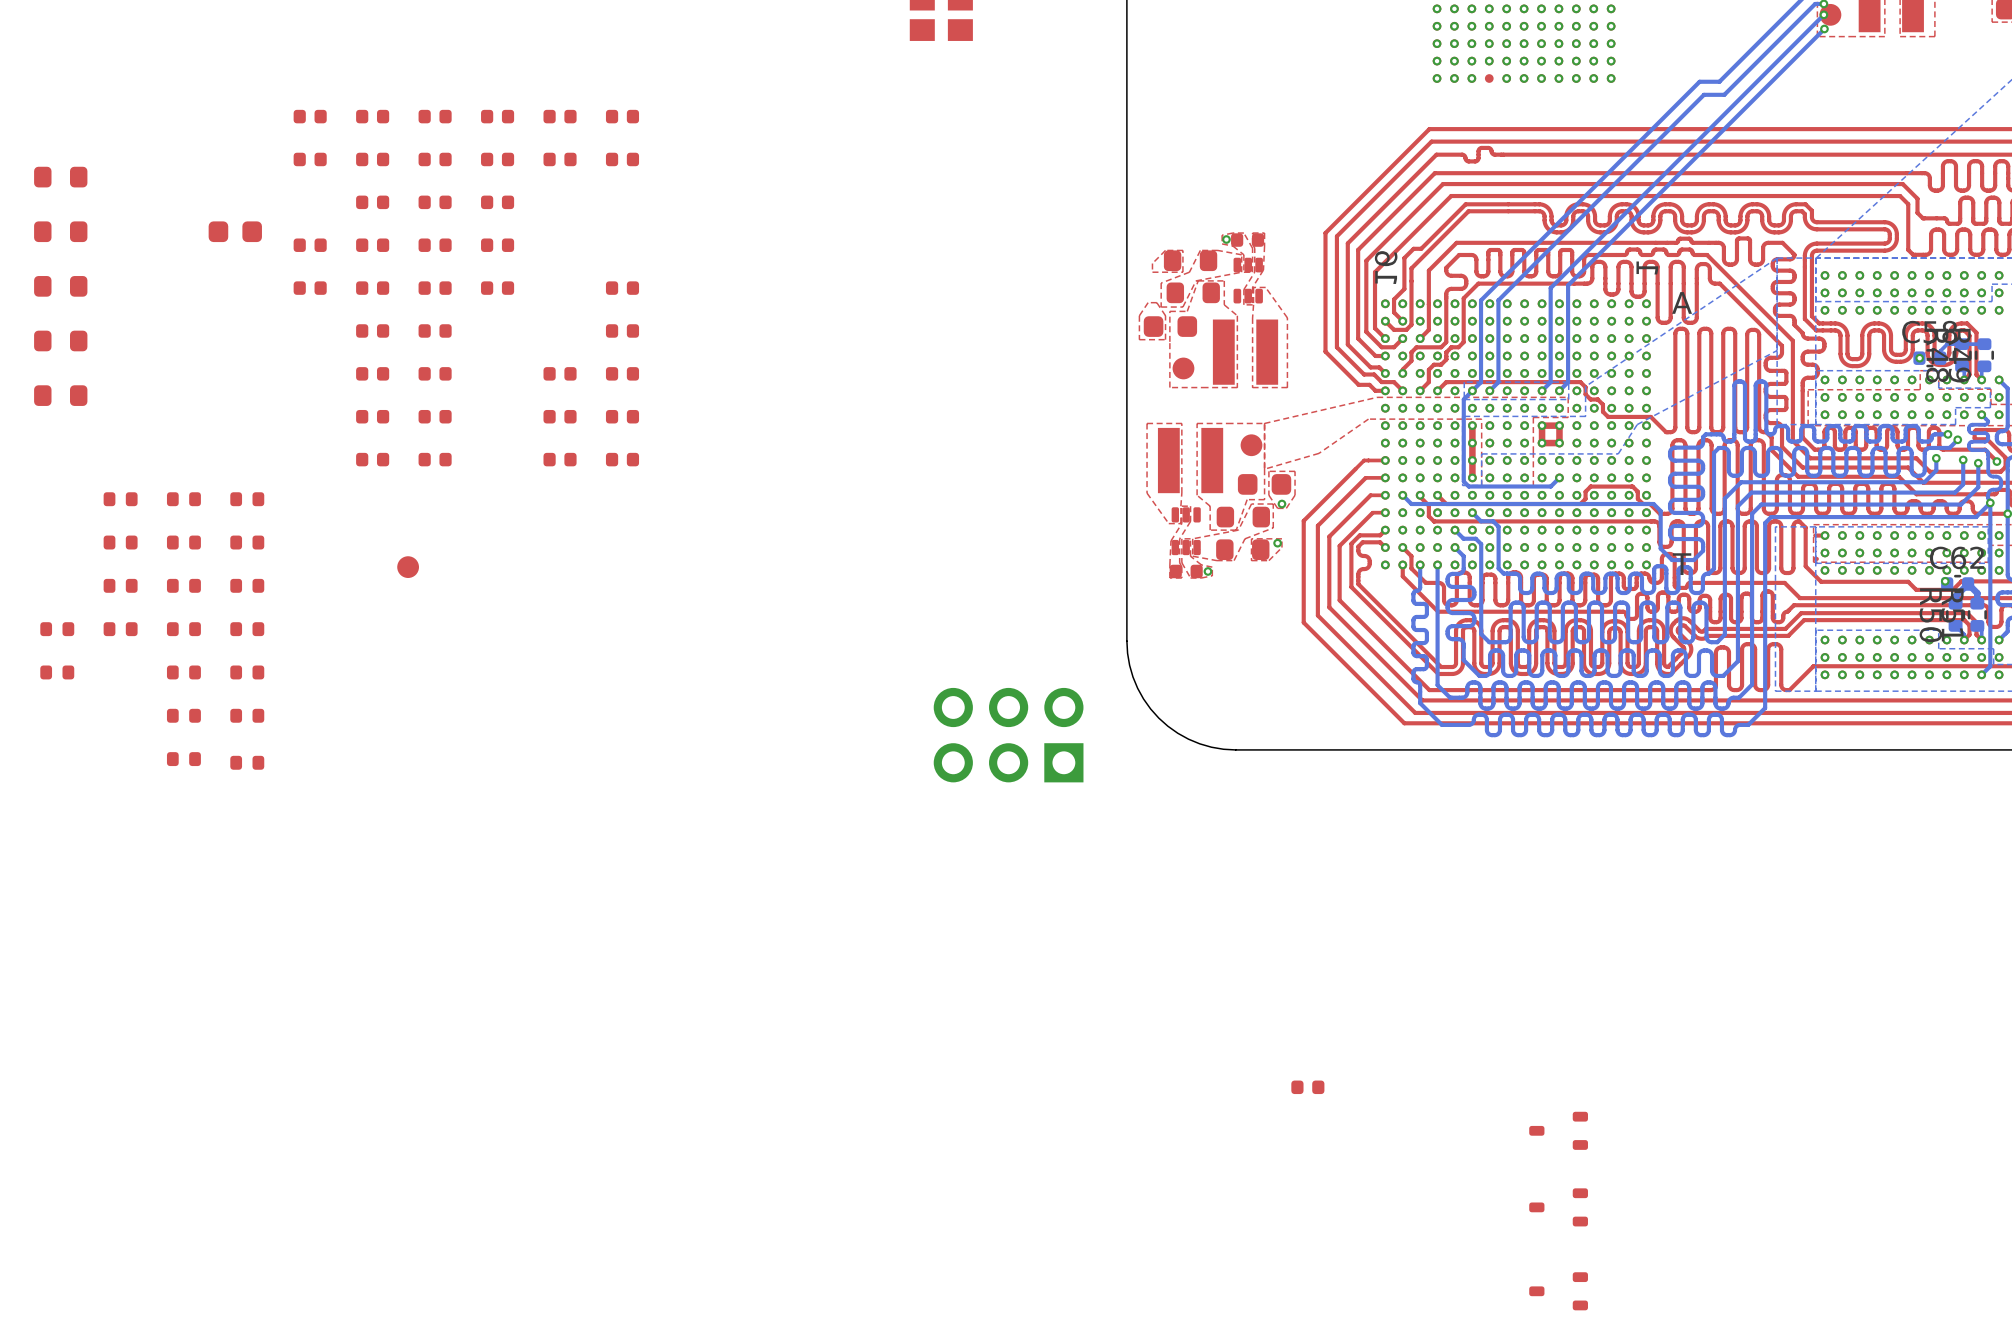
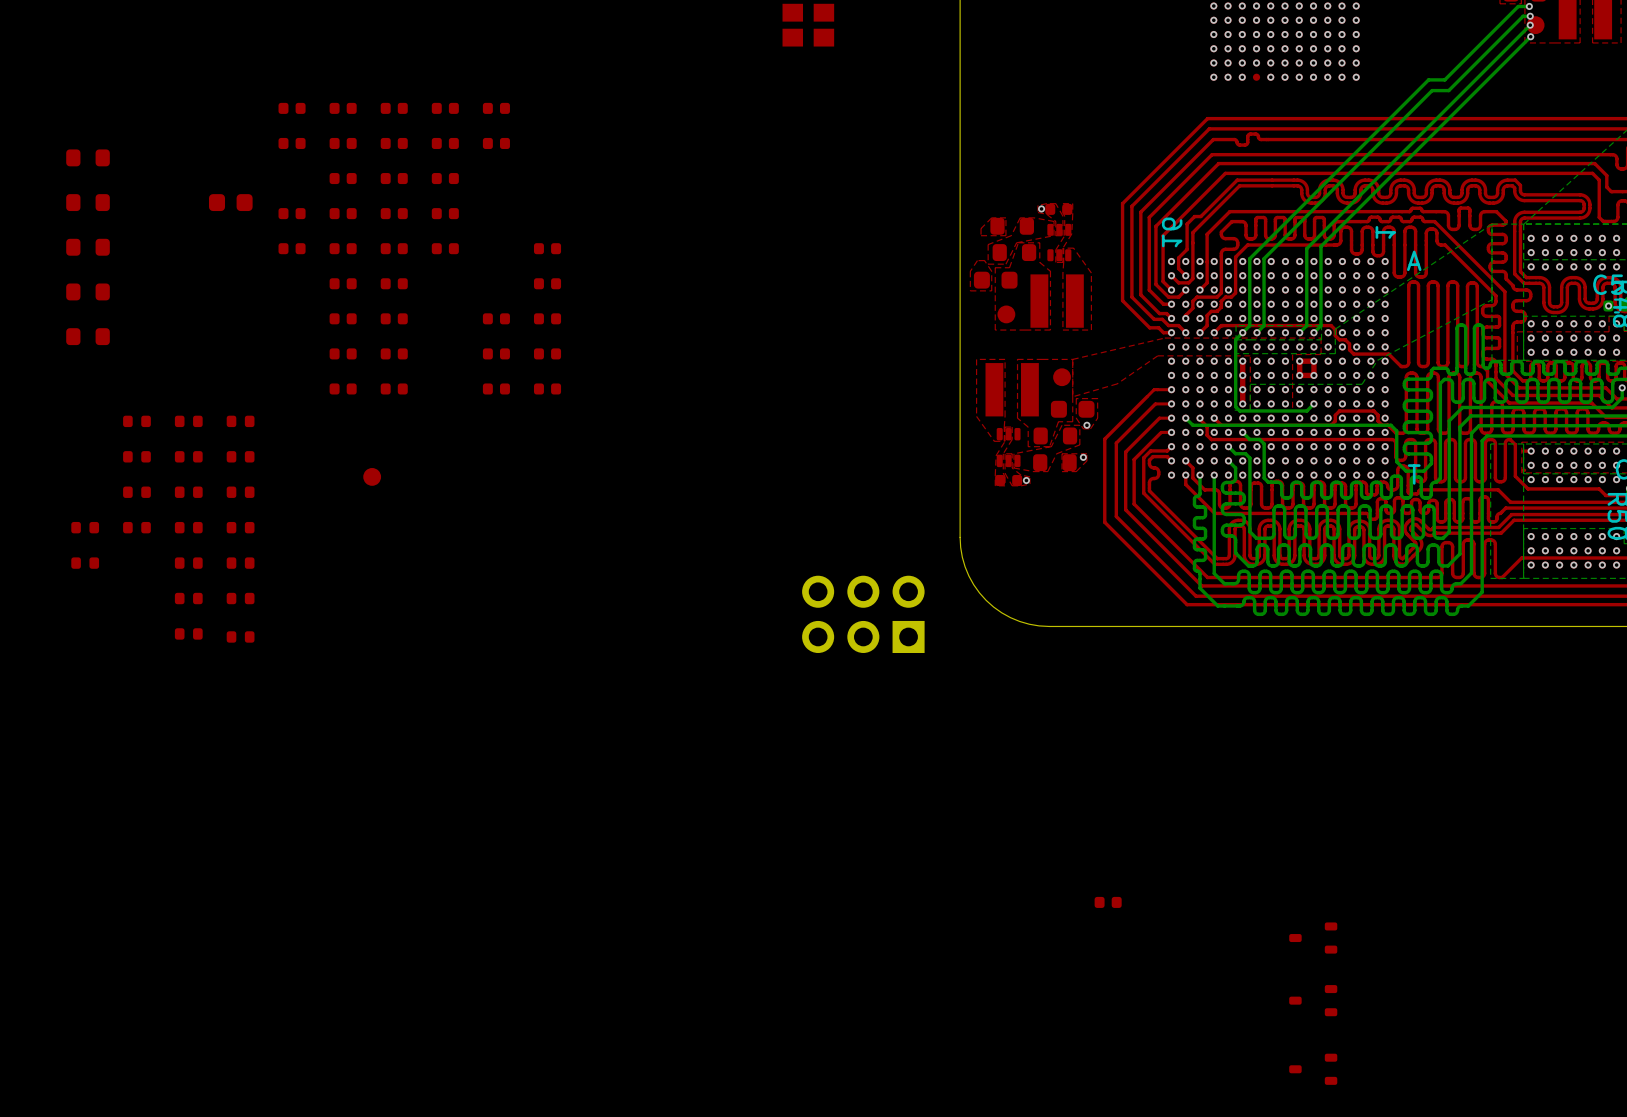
part: (622, 116) -> none
part: (622, 159) -> none

